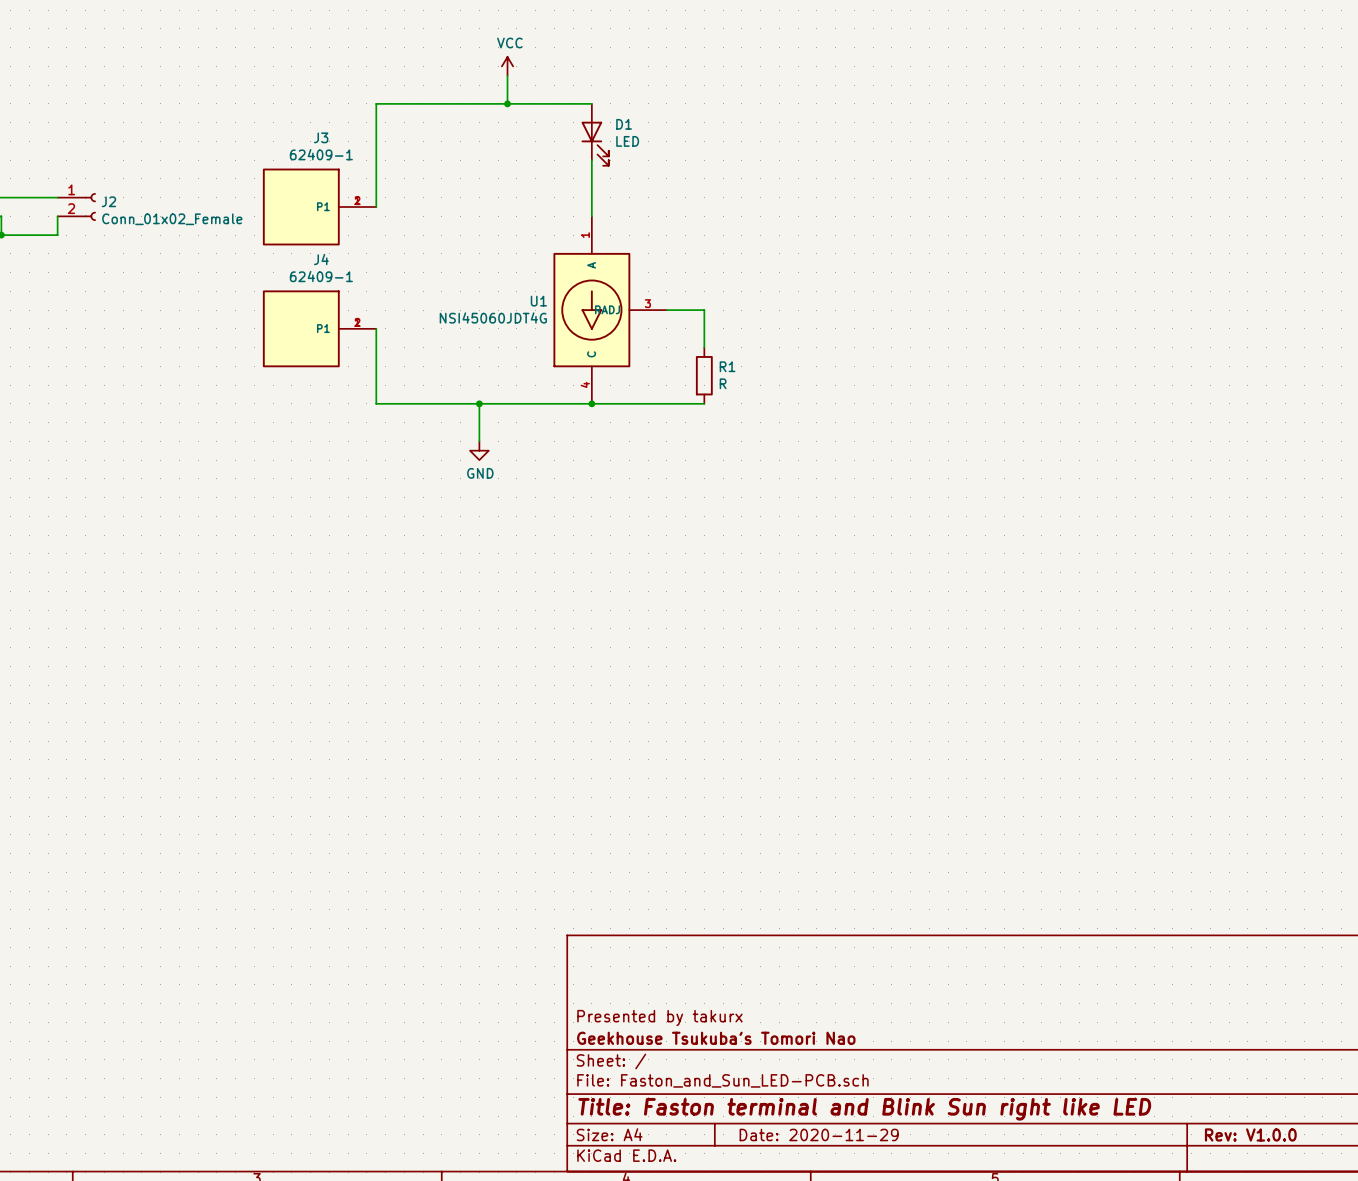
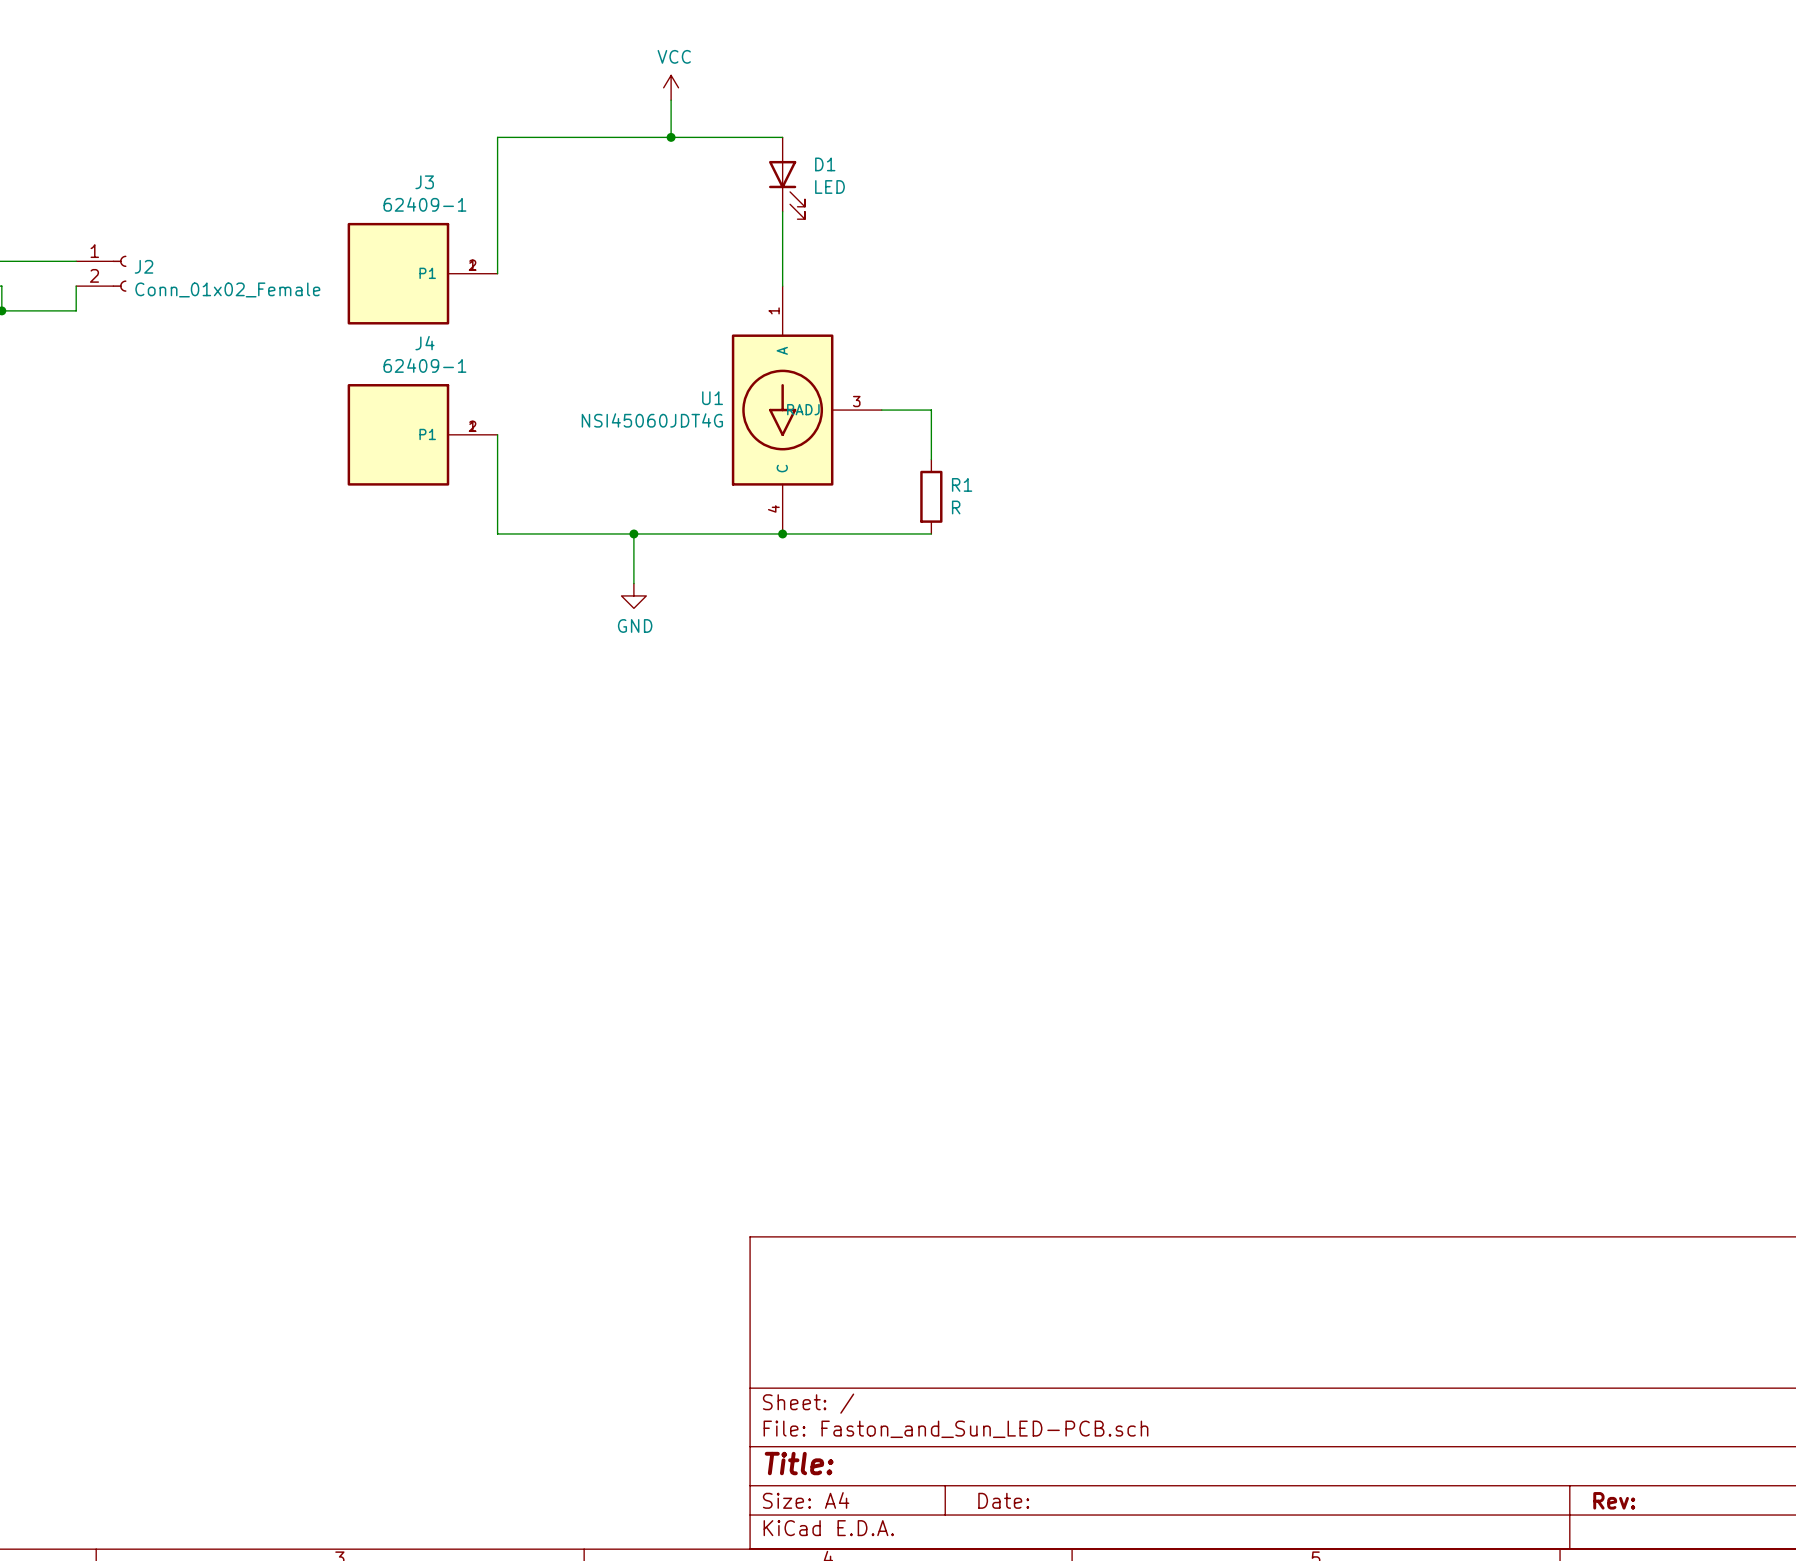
title block: Presented by takurx (659, 1018) -> none
title block: Geekhouse Tsukuba's Tomori Nao (716, 1038) -> none
title block: Title: Faston terminal and Blink Sun right like LED (864, 1109) -> Title: (799, 1463)
title block: Date: 2020-11-29 (819, 1134) -> Date: (1003, 1500)
title block: Rev: V1.0.0 (1250, 1134) -> Rev: (1614, 1500)

